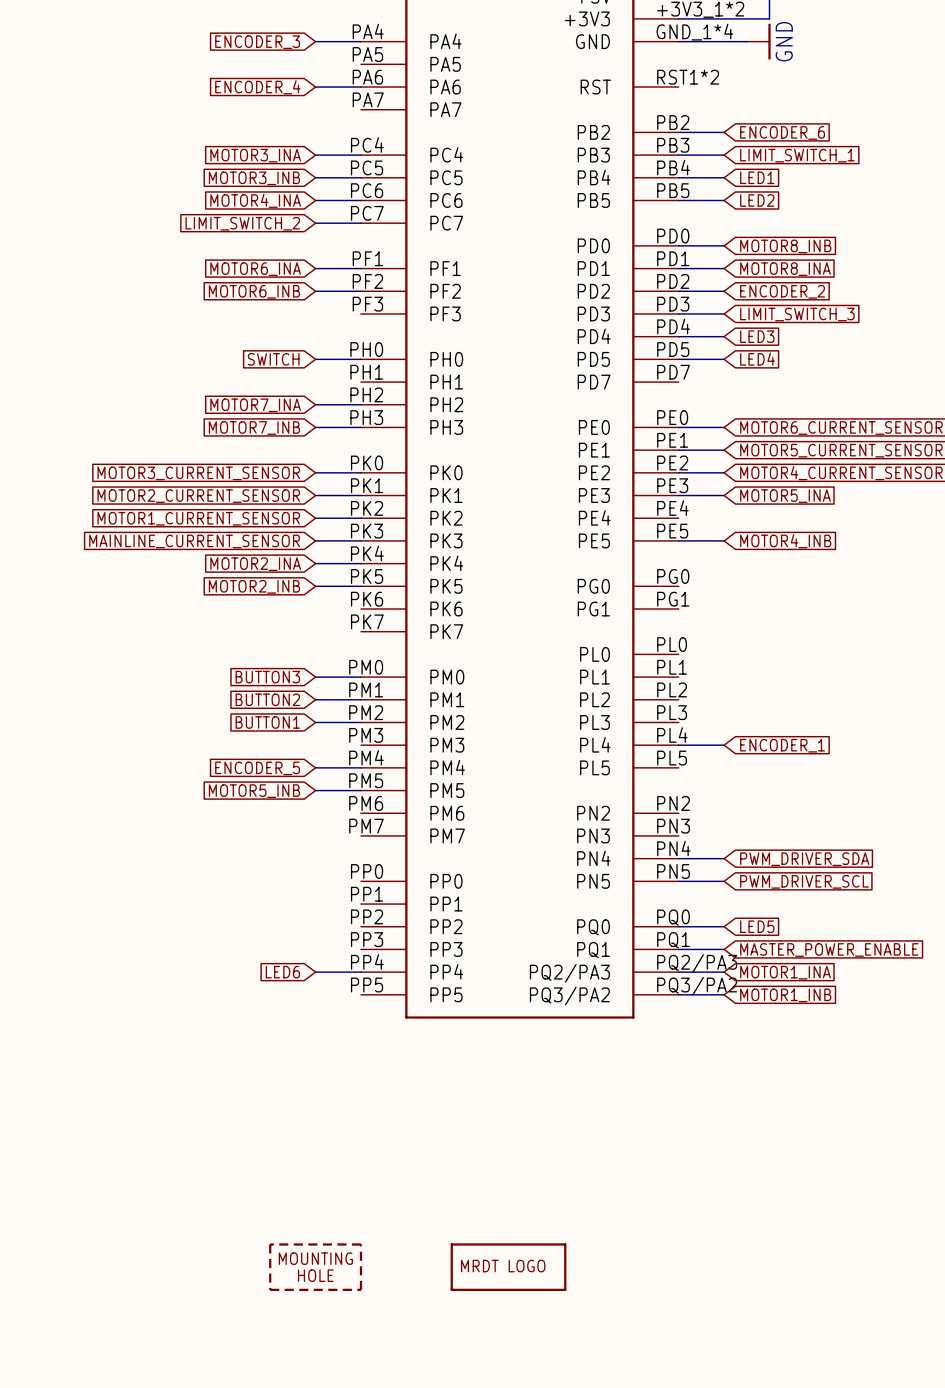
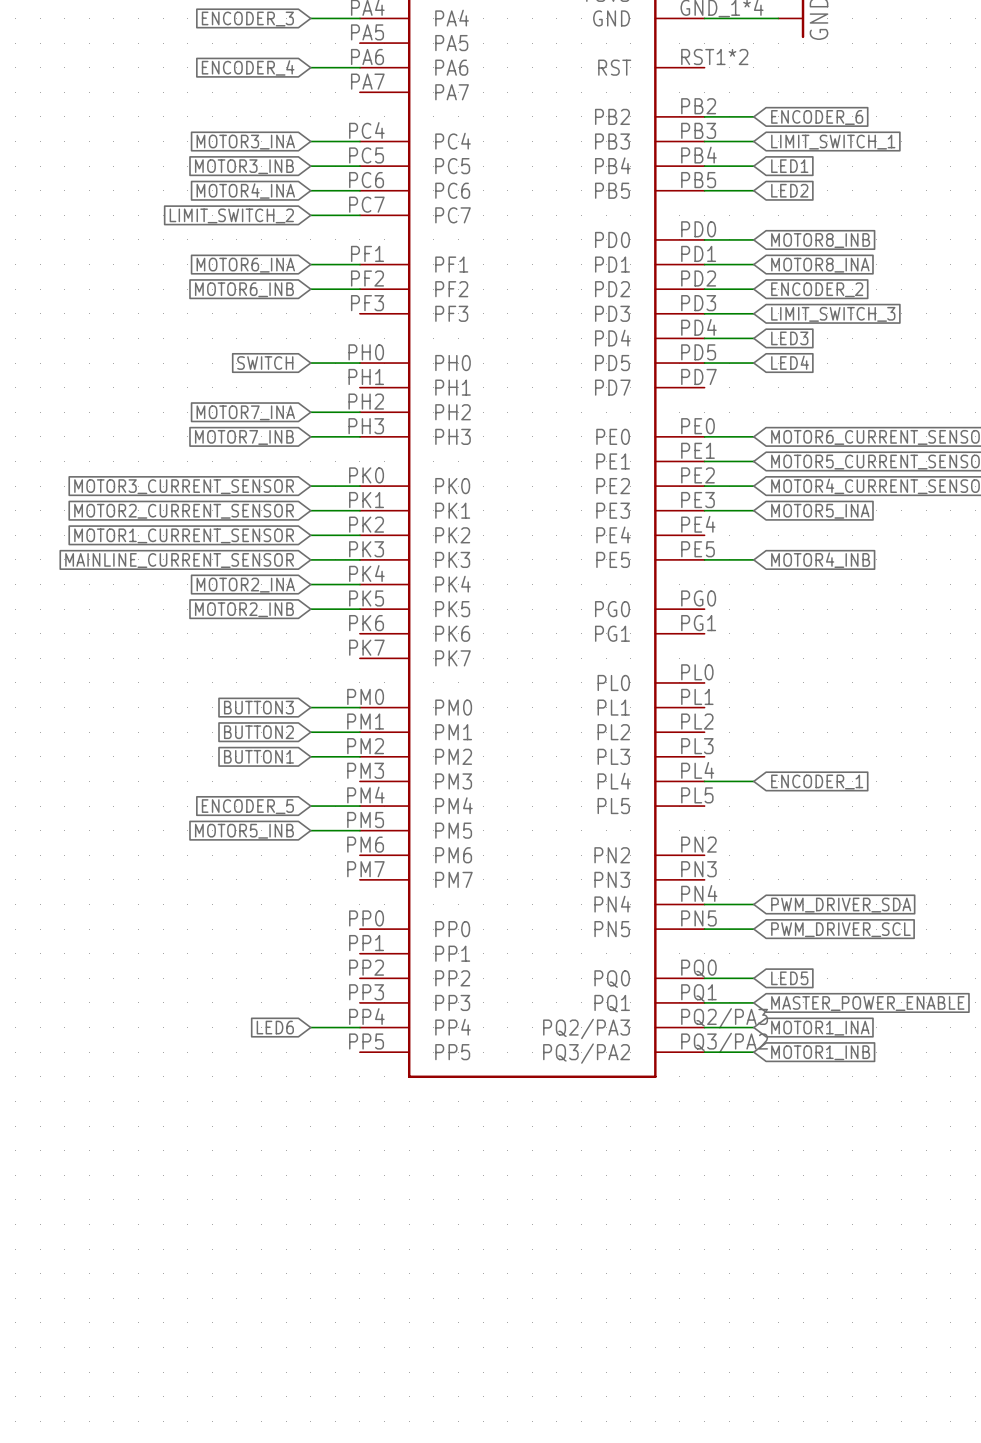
part: (315, 1267) -> none
part: (508, 1267) -> none

